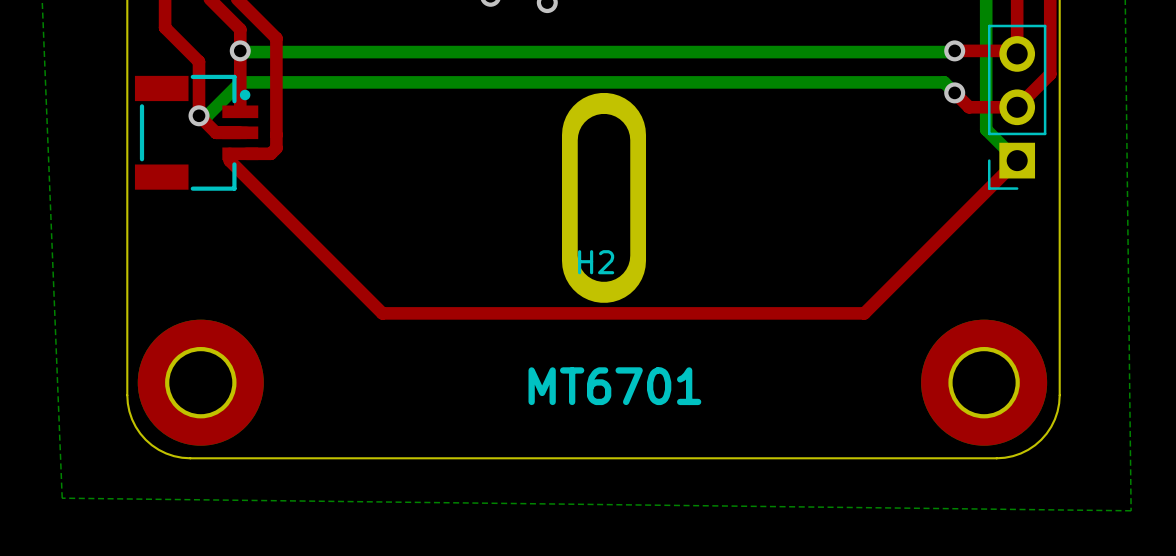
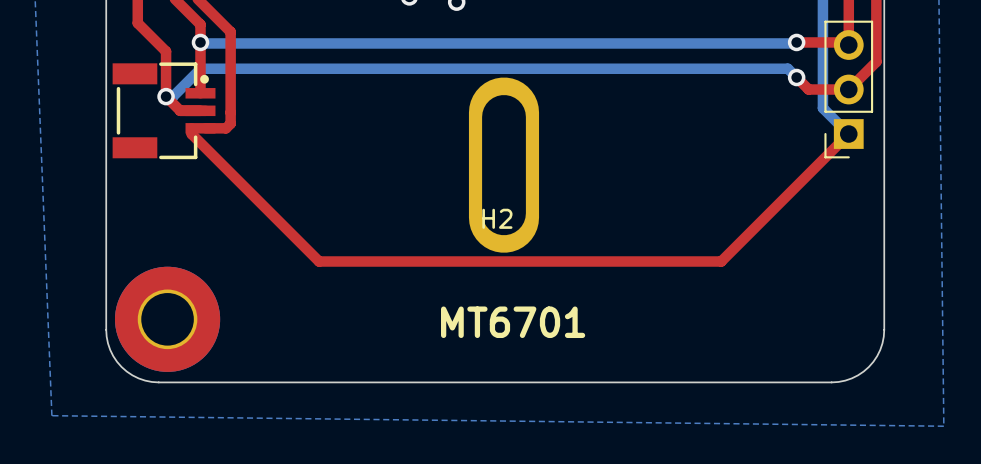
part: (984, 382) -> none

